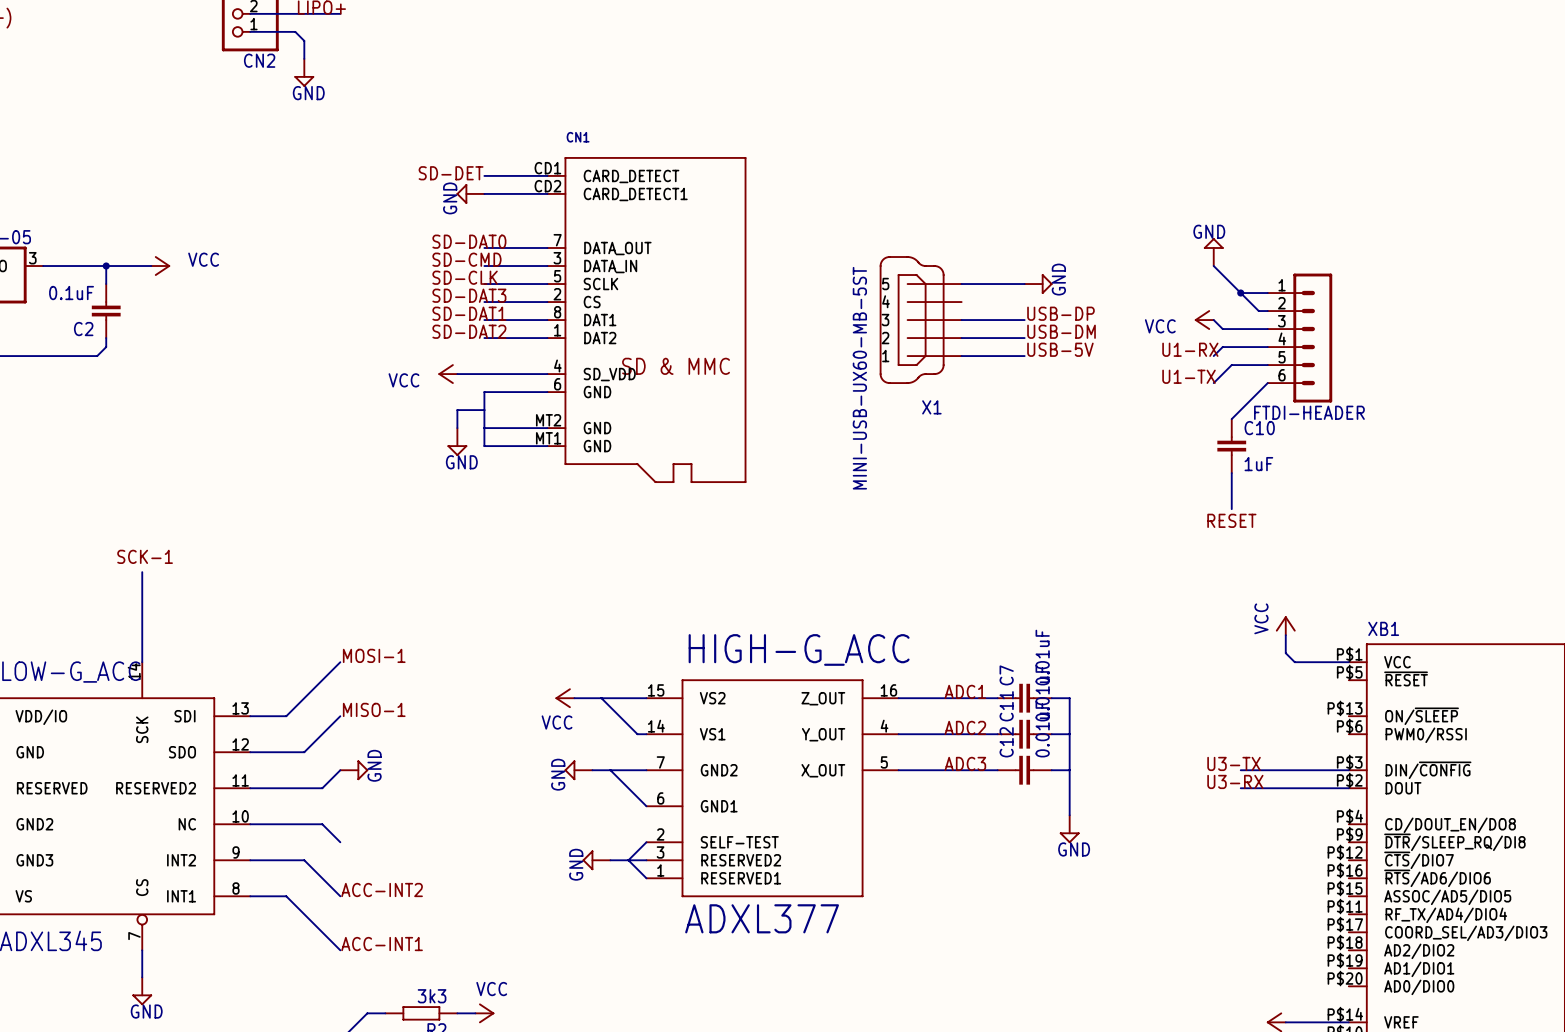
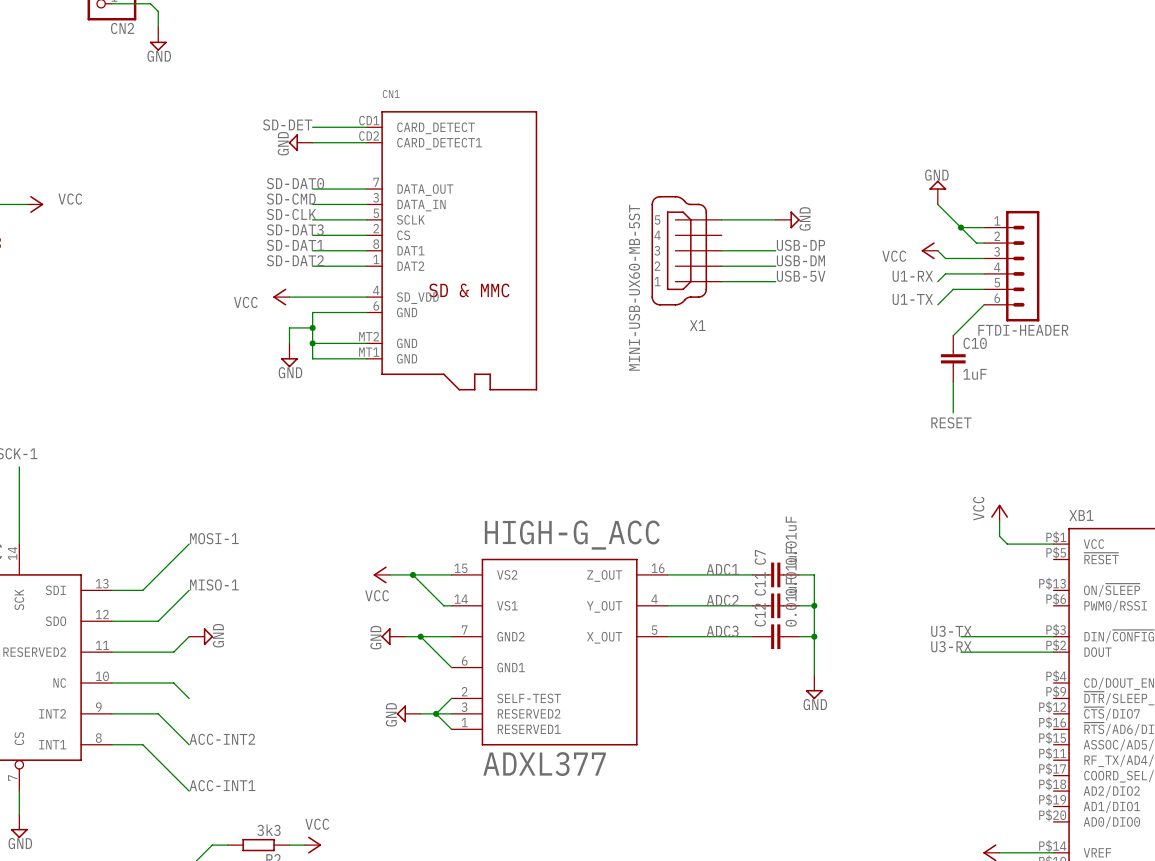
junction: none -> (312, 327)
junction: none -> (312, 343)
junction: none -> (412, 574)
junction: none -> (814, 605)
junction: none -> (420, 636)
junction: none -> (814, 636)
junction: none -> (436, 713)

